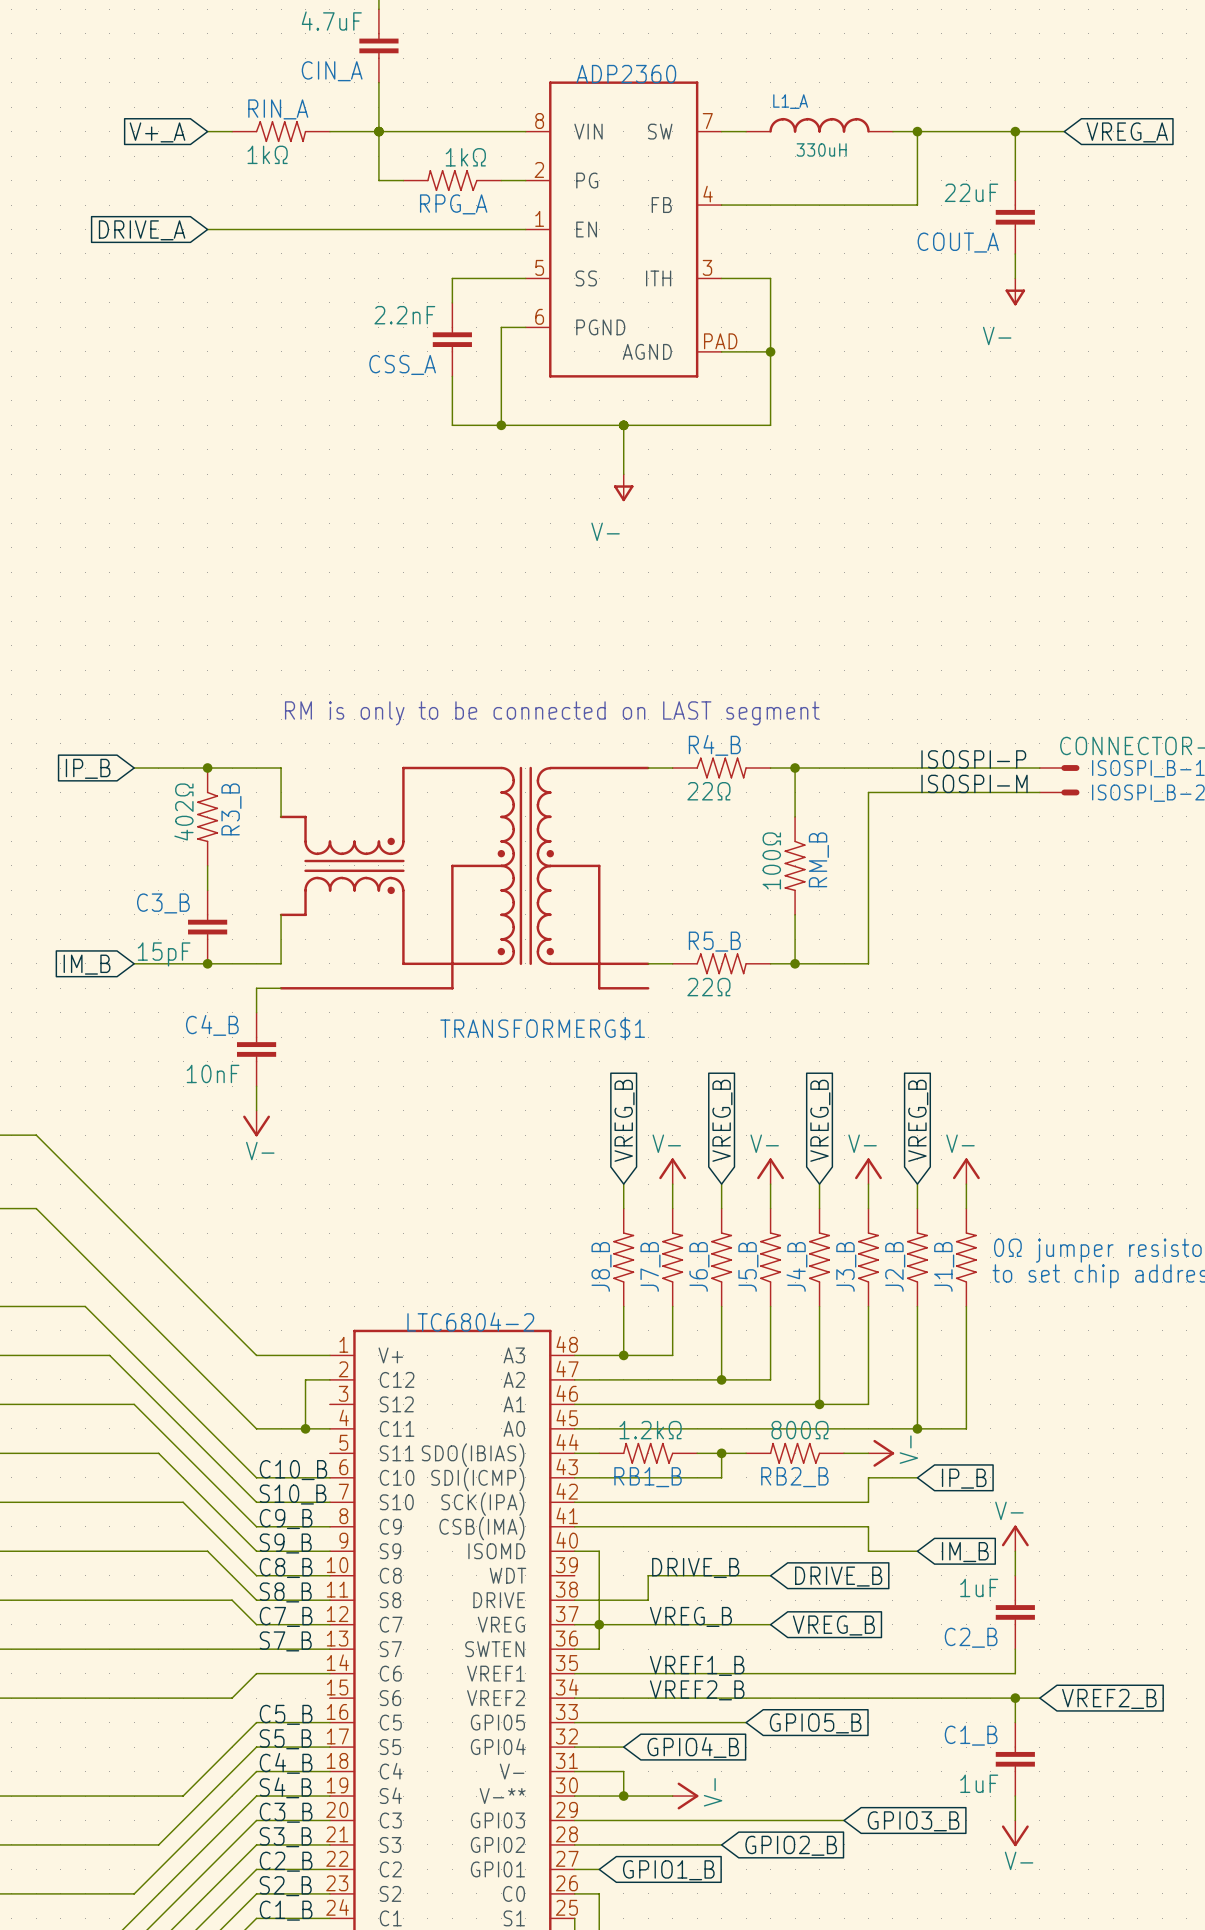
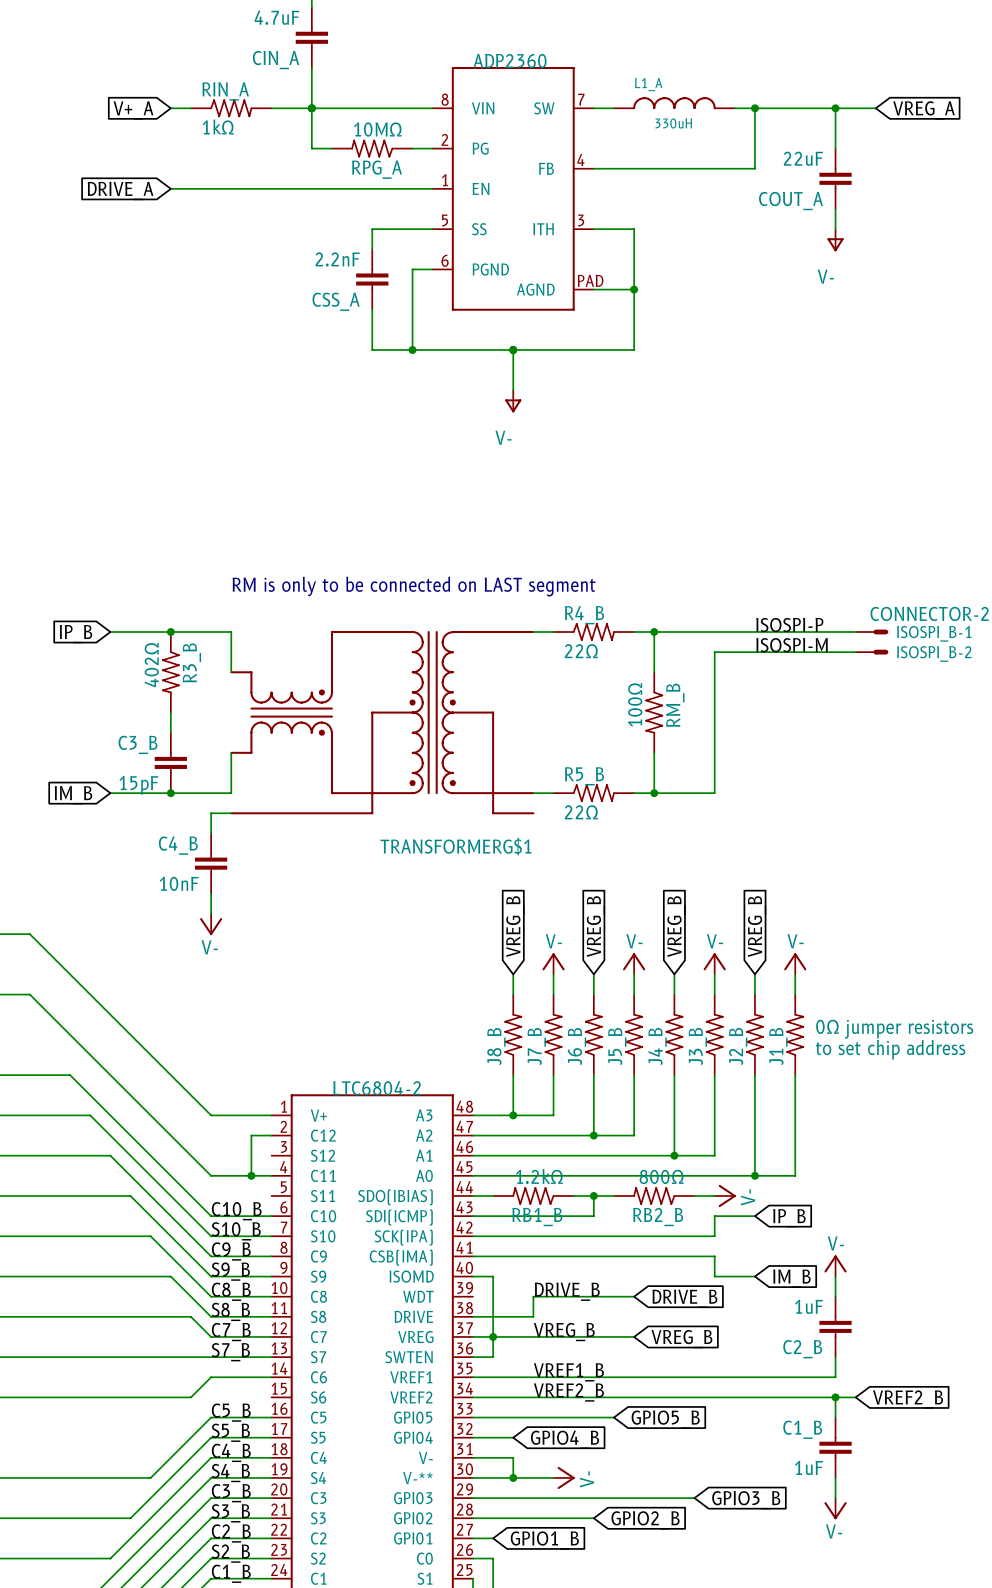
RPG_A value: 1kΩ (465, 157) -> 10MΩ (377, 129)

